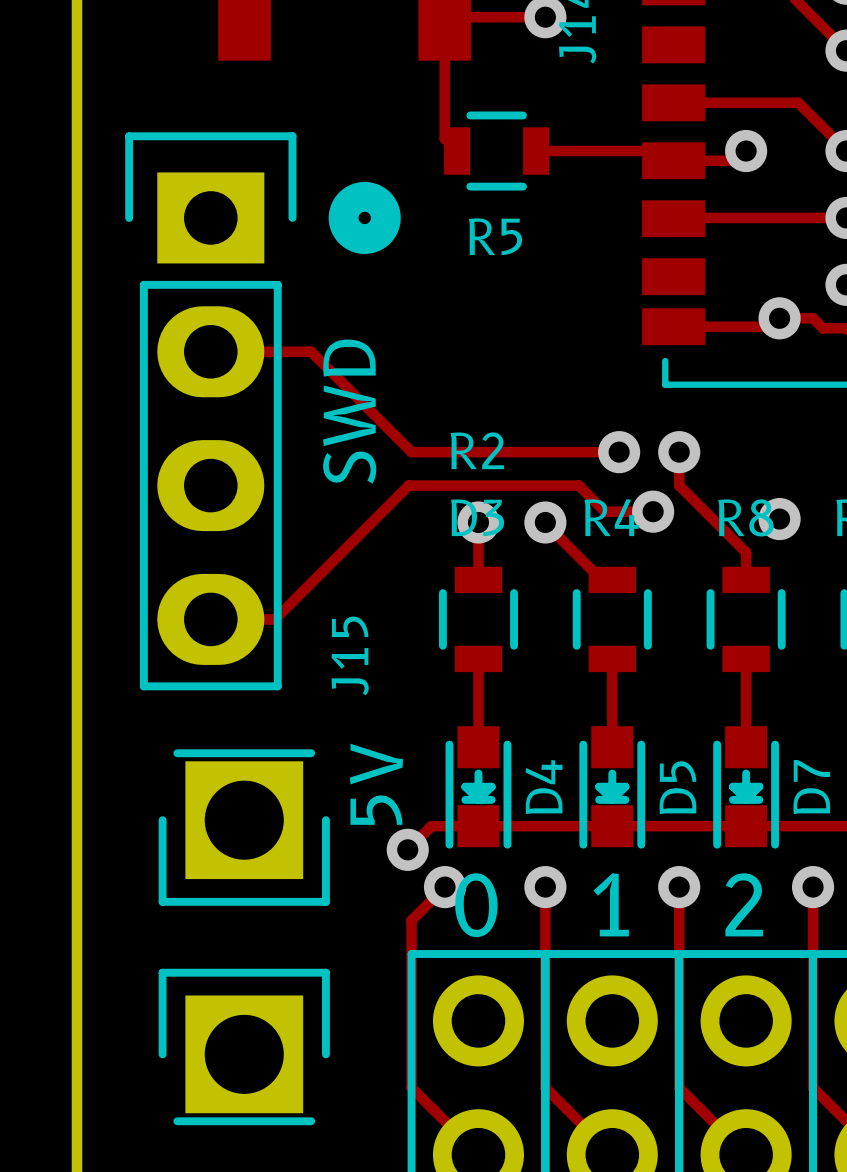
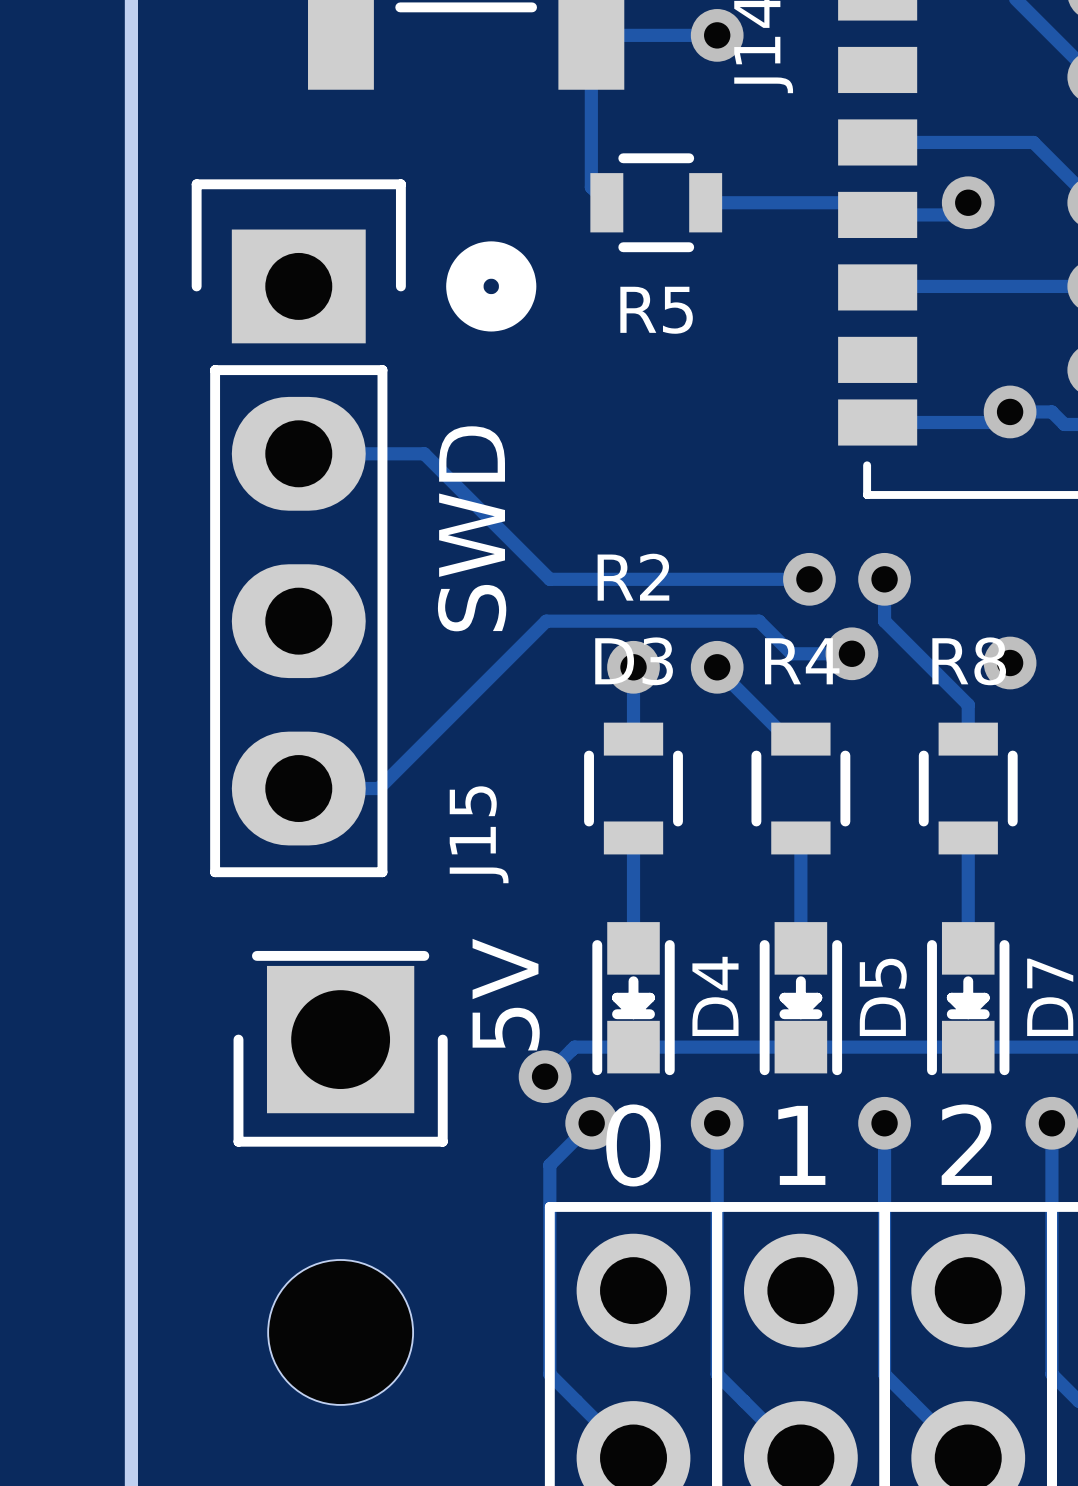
part footprint: [158, 968, 330, 1126] -> [268, 1259, 414, 1405]

